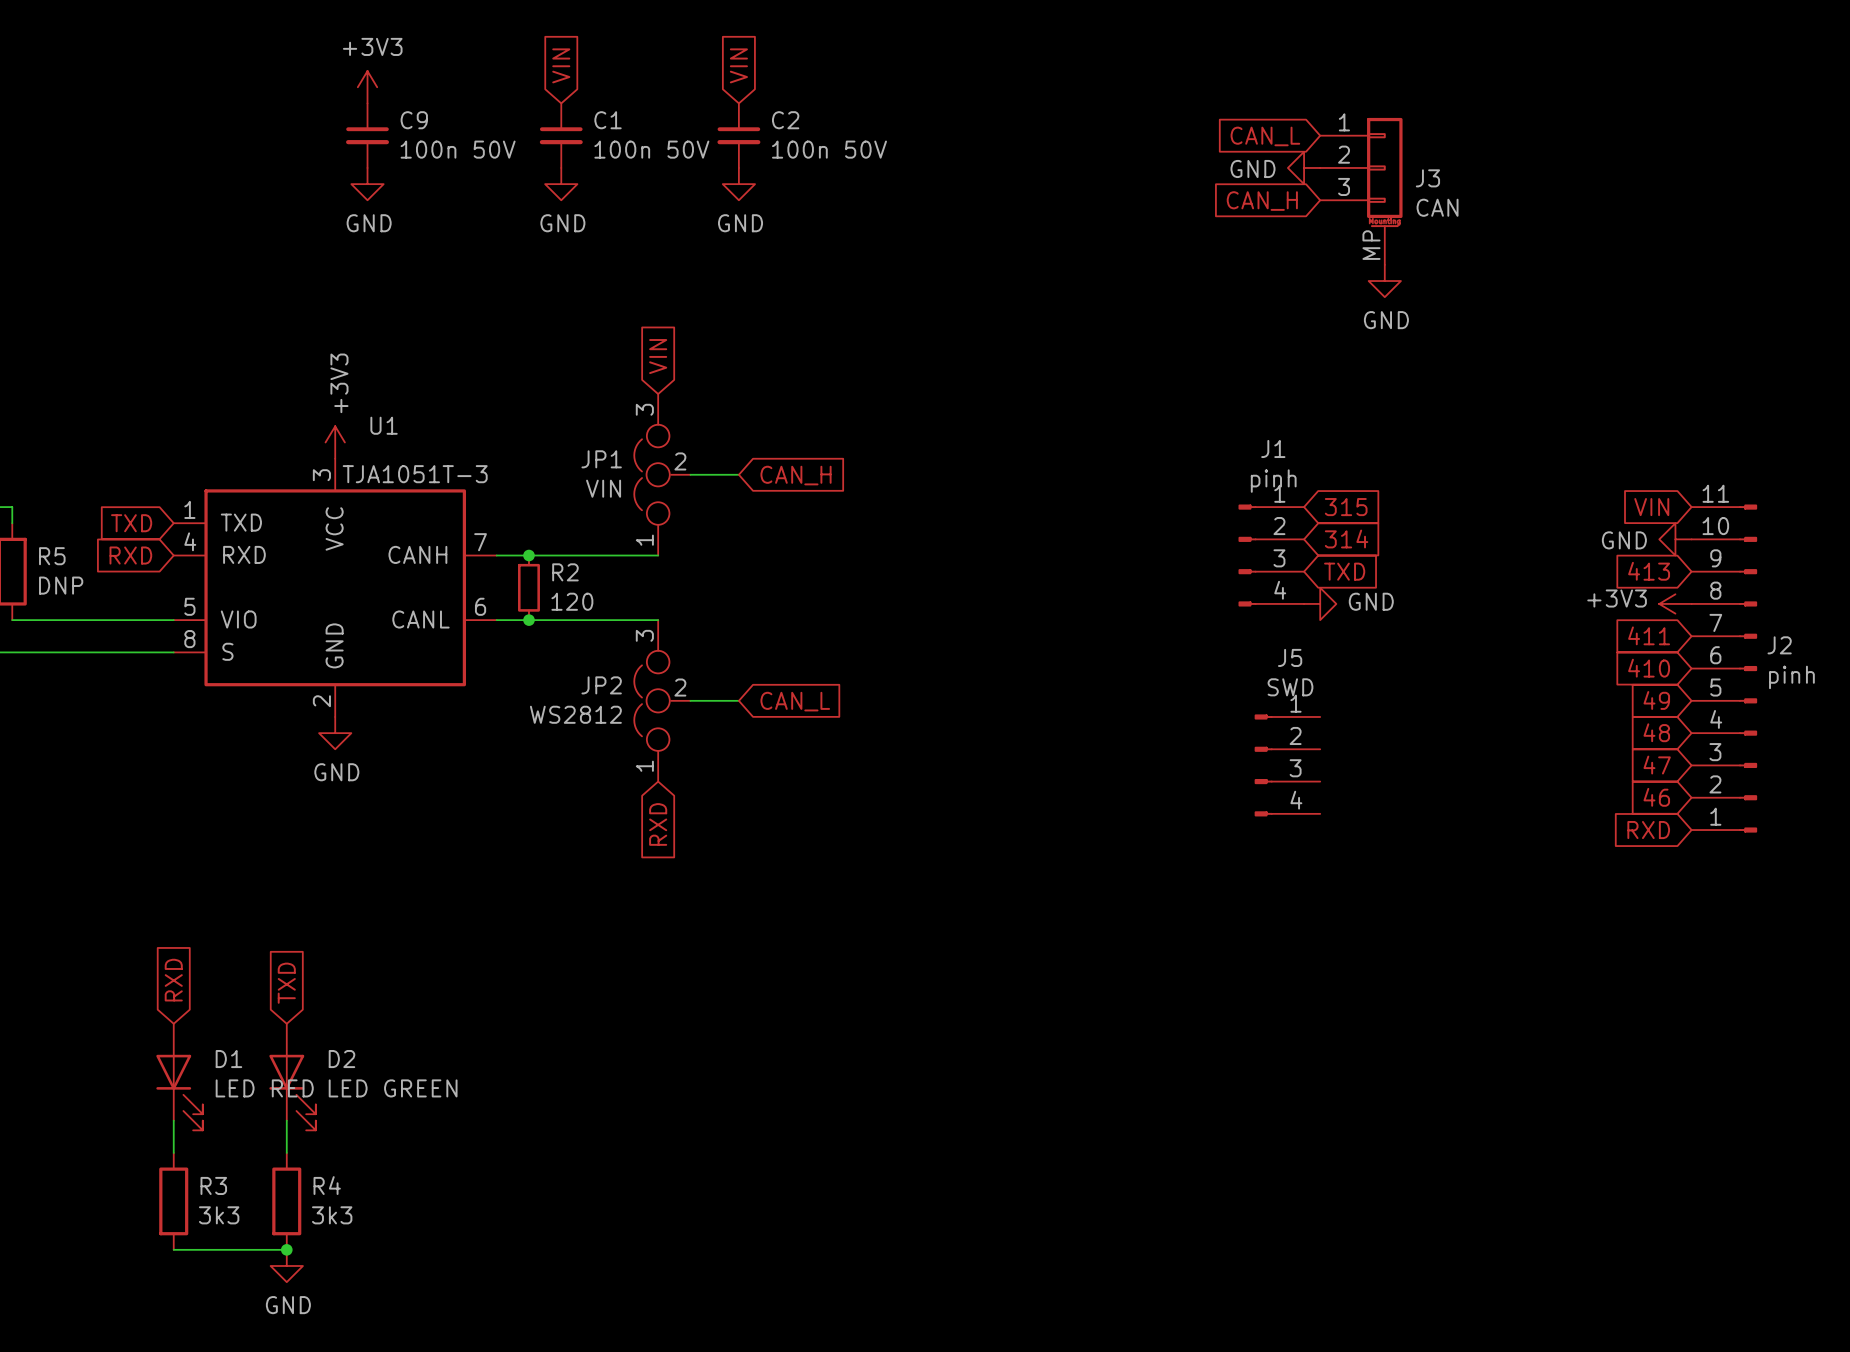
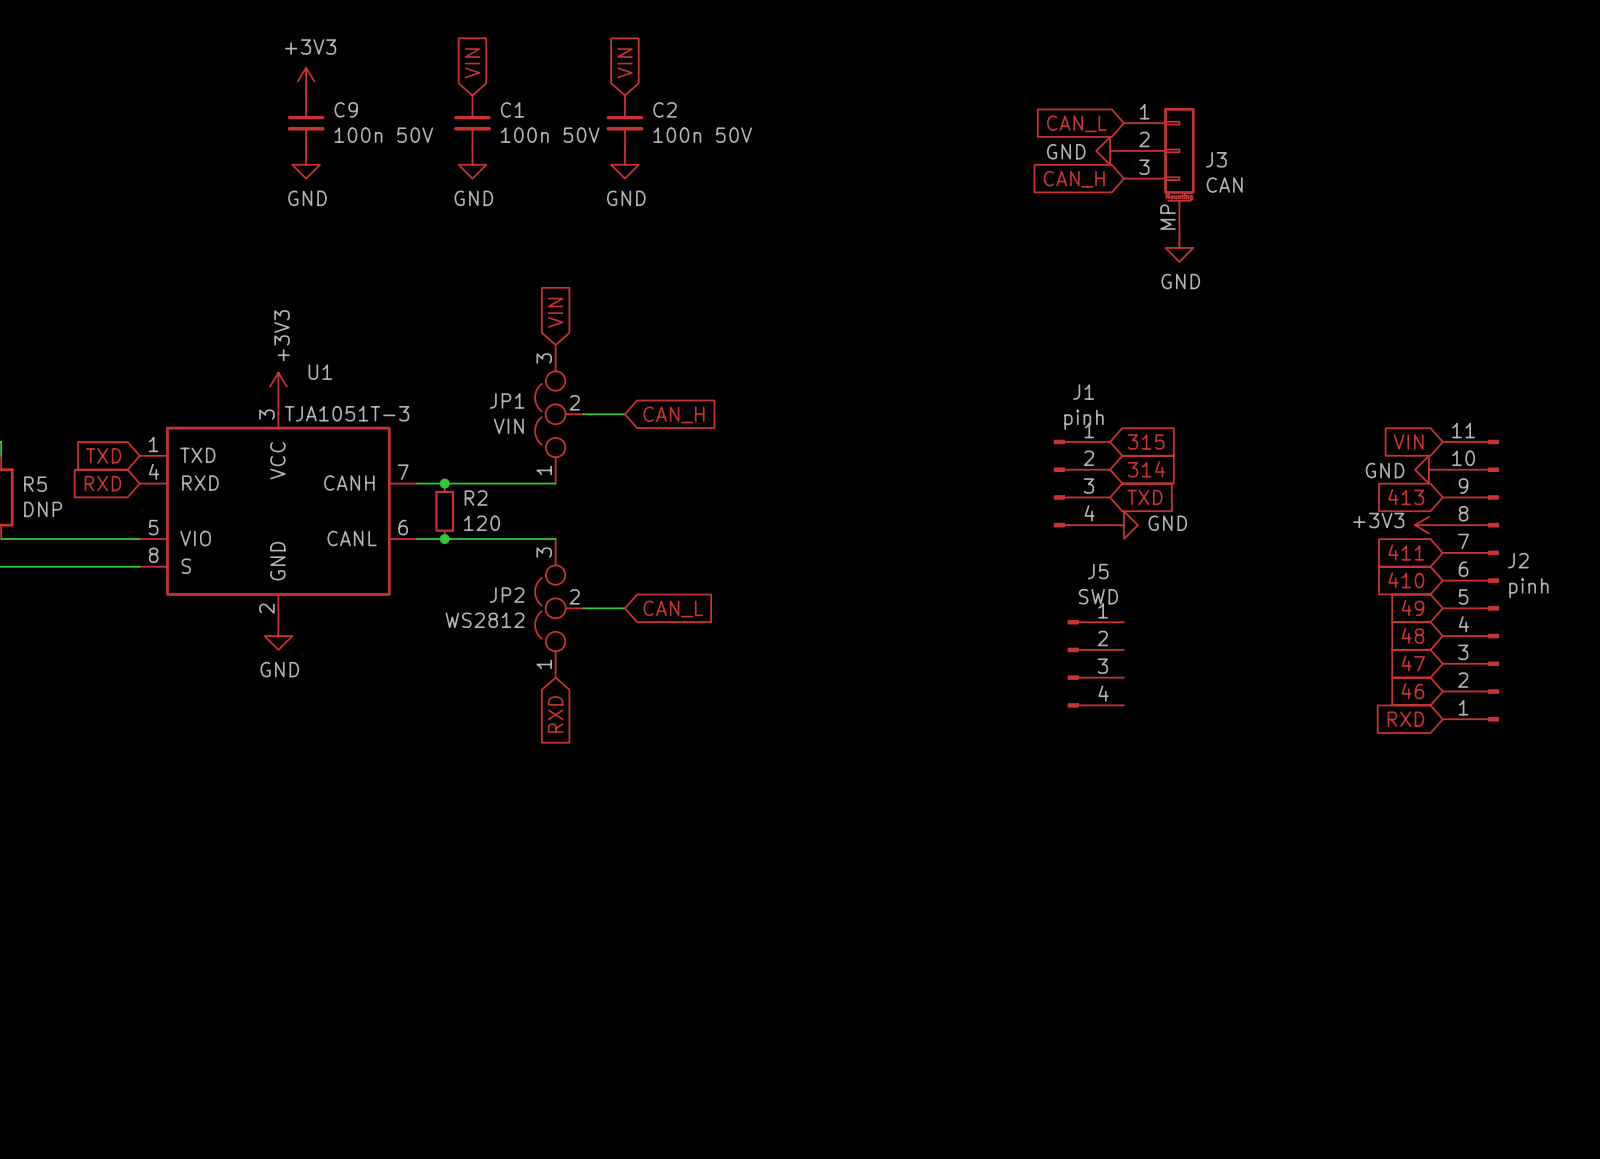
global label: RXD (173, 980) -> none
global label: TXD (286, 983) -> none
D1: LED RED (179, 1077) -> none
D2: LED GREEN (292, 1077) -> none
wire: (173, 1120) (173, 1152) -> none
wire: (286, 1120) (286, 1152) -> none
R3: 3k3 (173, 1201) -> none
R4: 3k3 (286, 1201) -> none
wire: (173, 1249) (286, 1249) -> none
junction: (286, 1249) -> none
power symbol: GND (286, 1266) -> none

